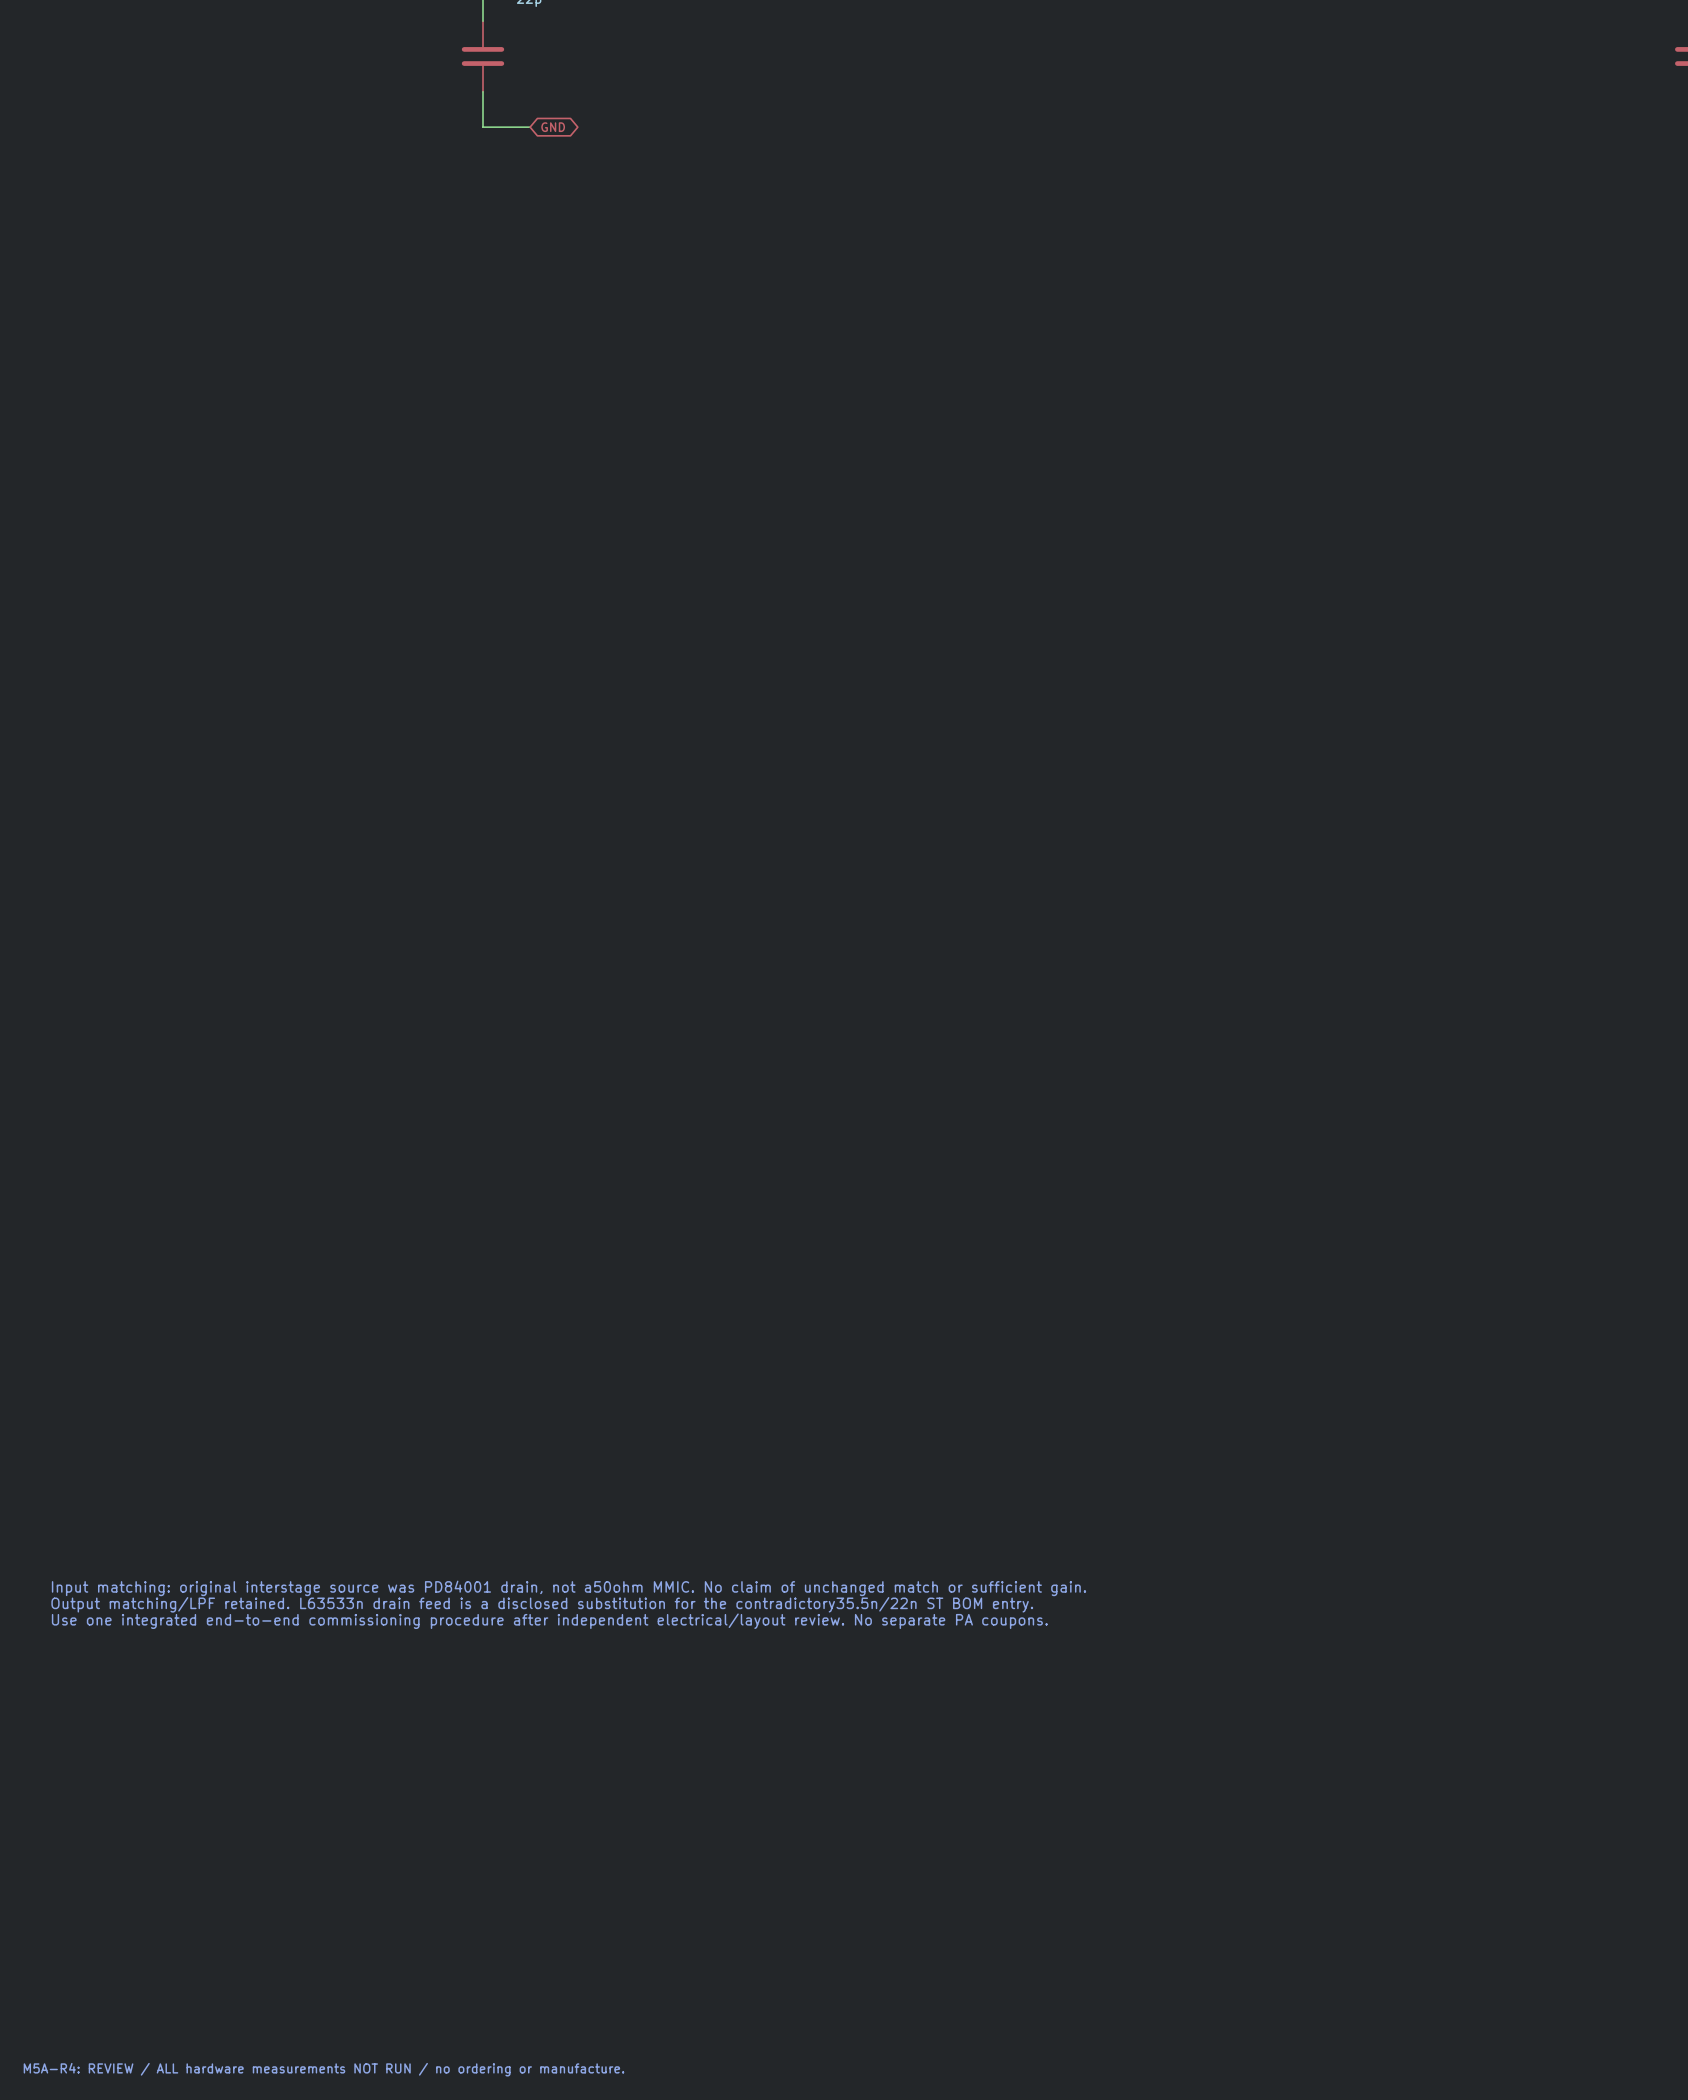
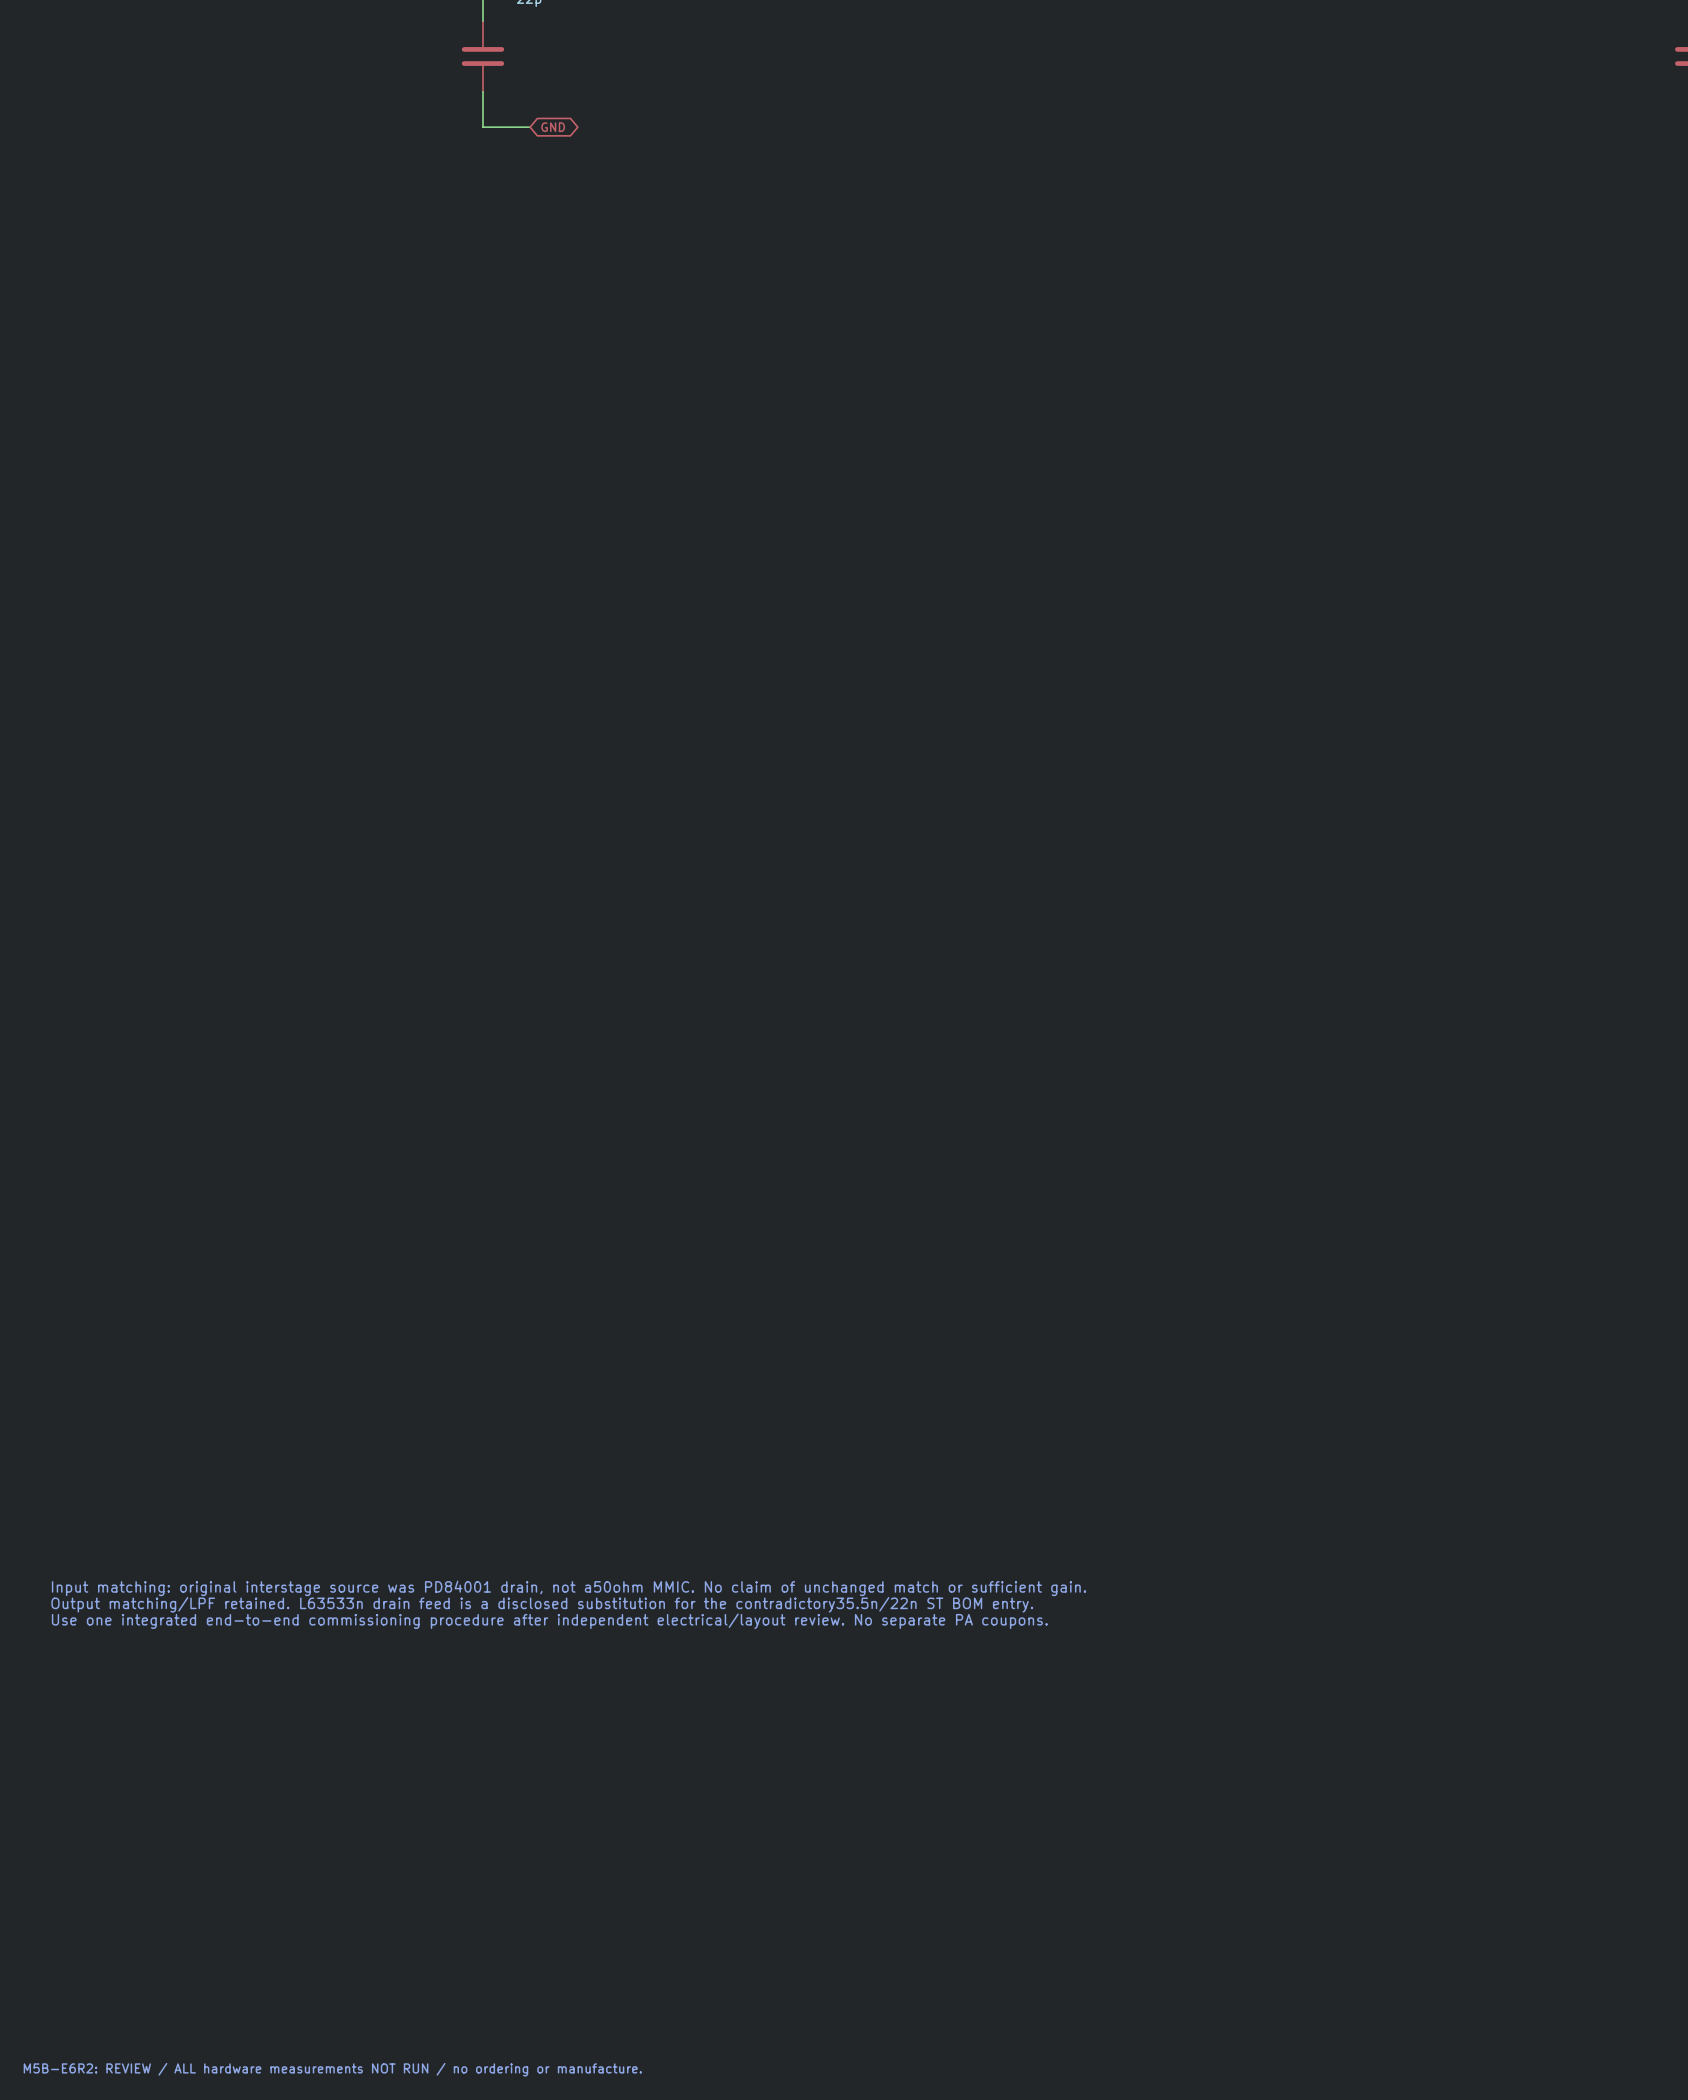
text: M5A-R4: REVIEW / ALL hardware measurements NOT RUN / no ordering or manufacture. (323, 2069) -> M5B-E6R2: REVIEW / ALL hardware measurements NOT RUN / no ordering or manufacture. (332, 2069)

